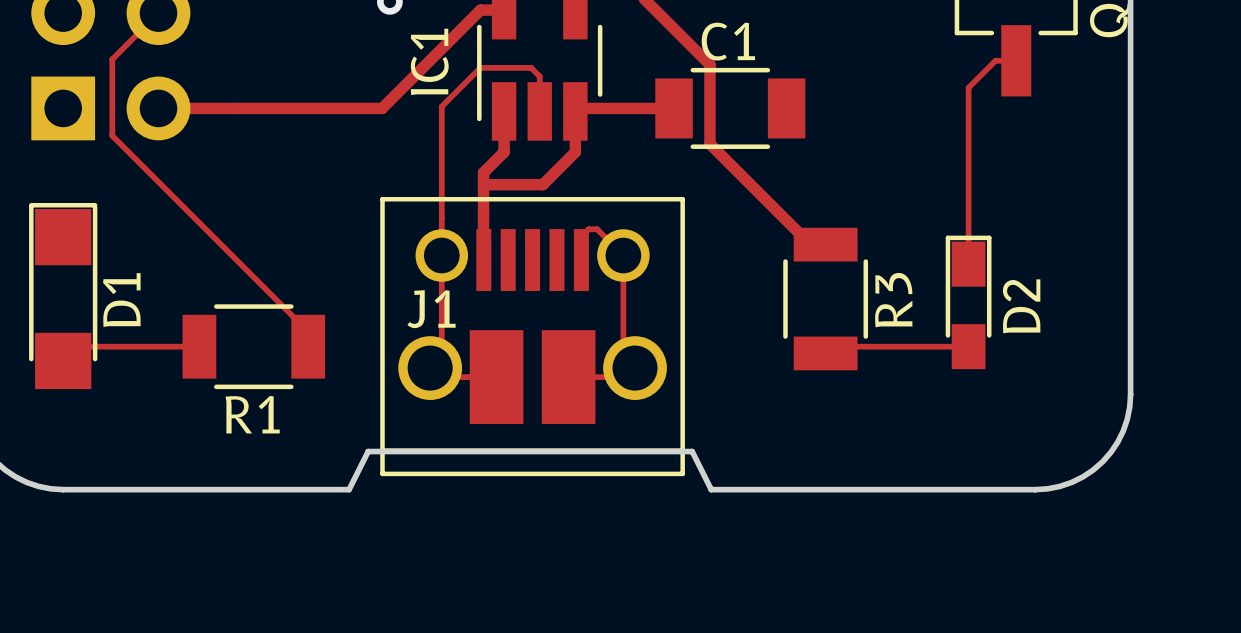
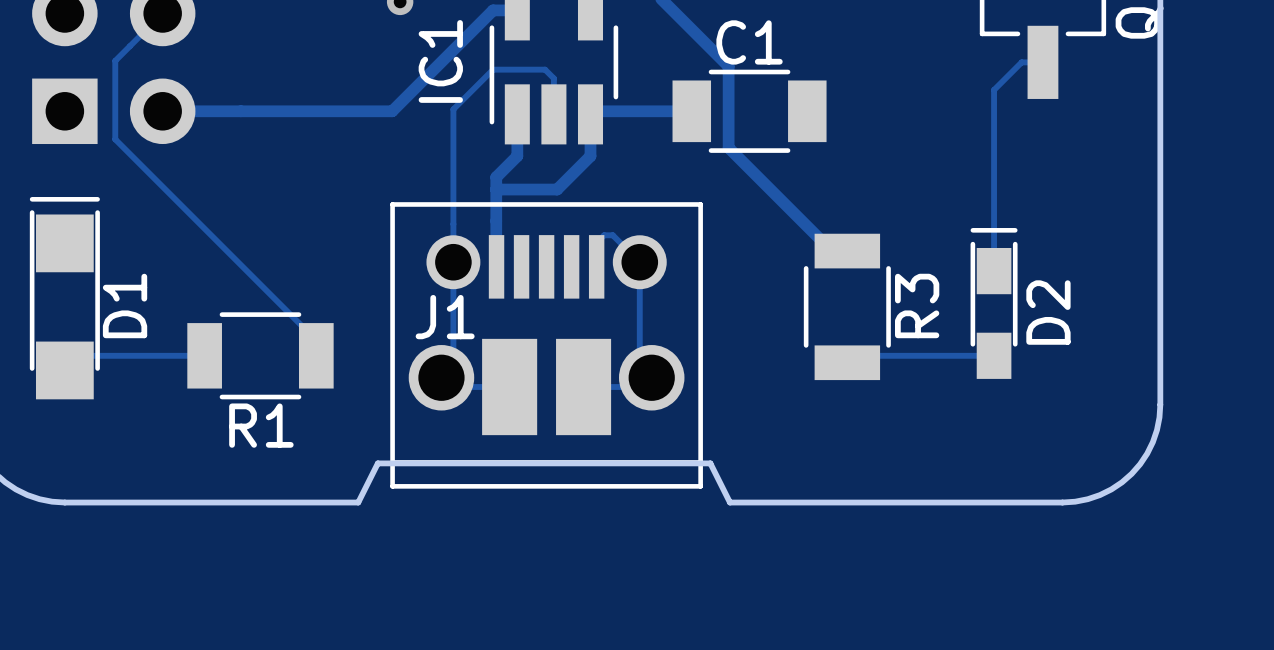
D1 footprint: [29, 202, 98, 390] -> [29, 197, 100, 400]
D2 footprint: [945, 235, 992, 370] -> [970, 228, 1018, 379]

